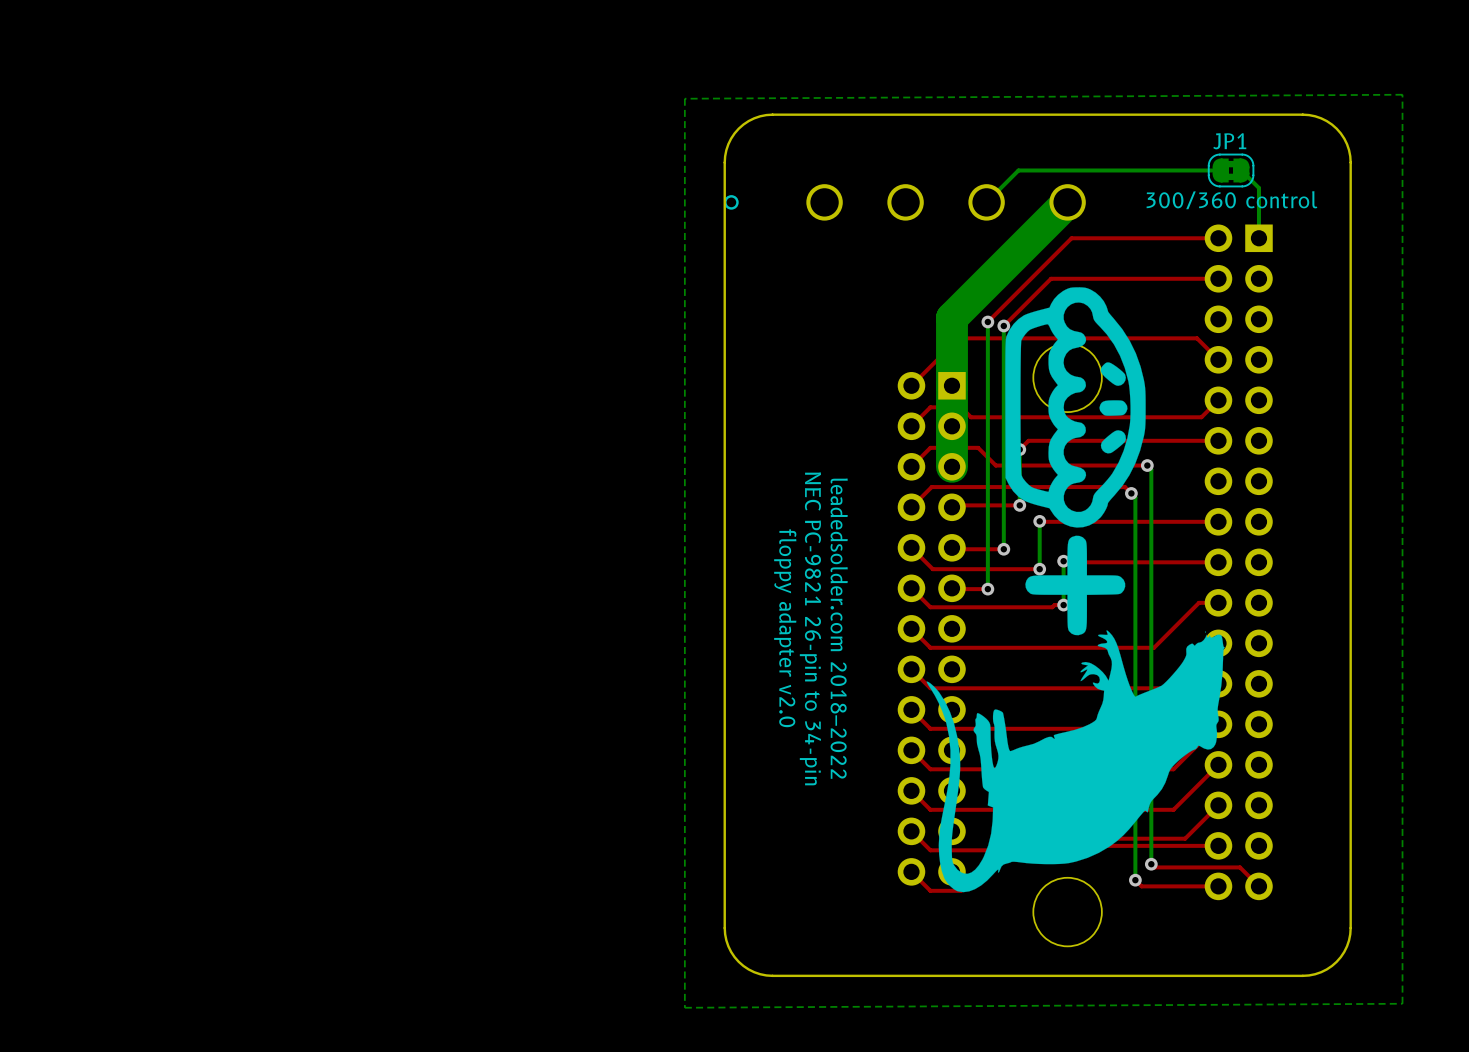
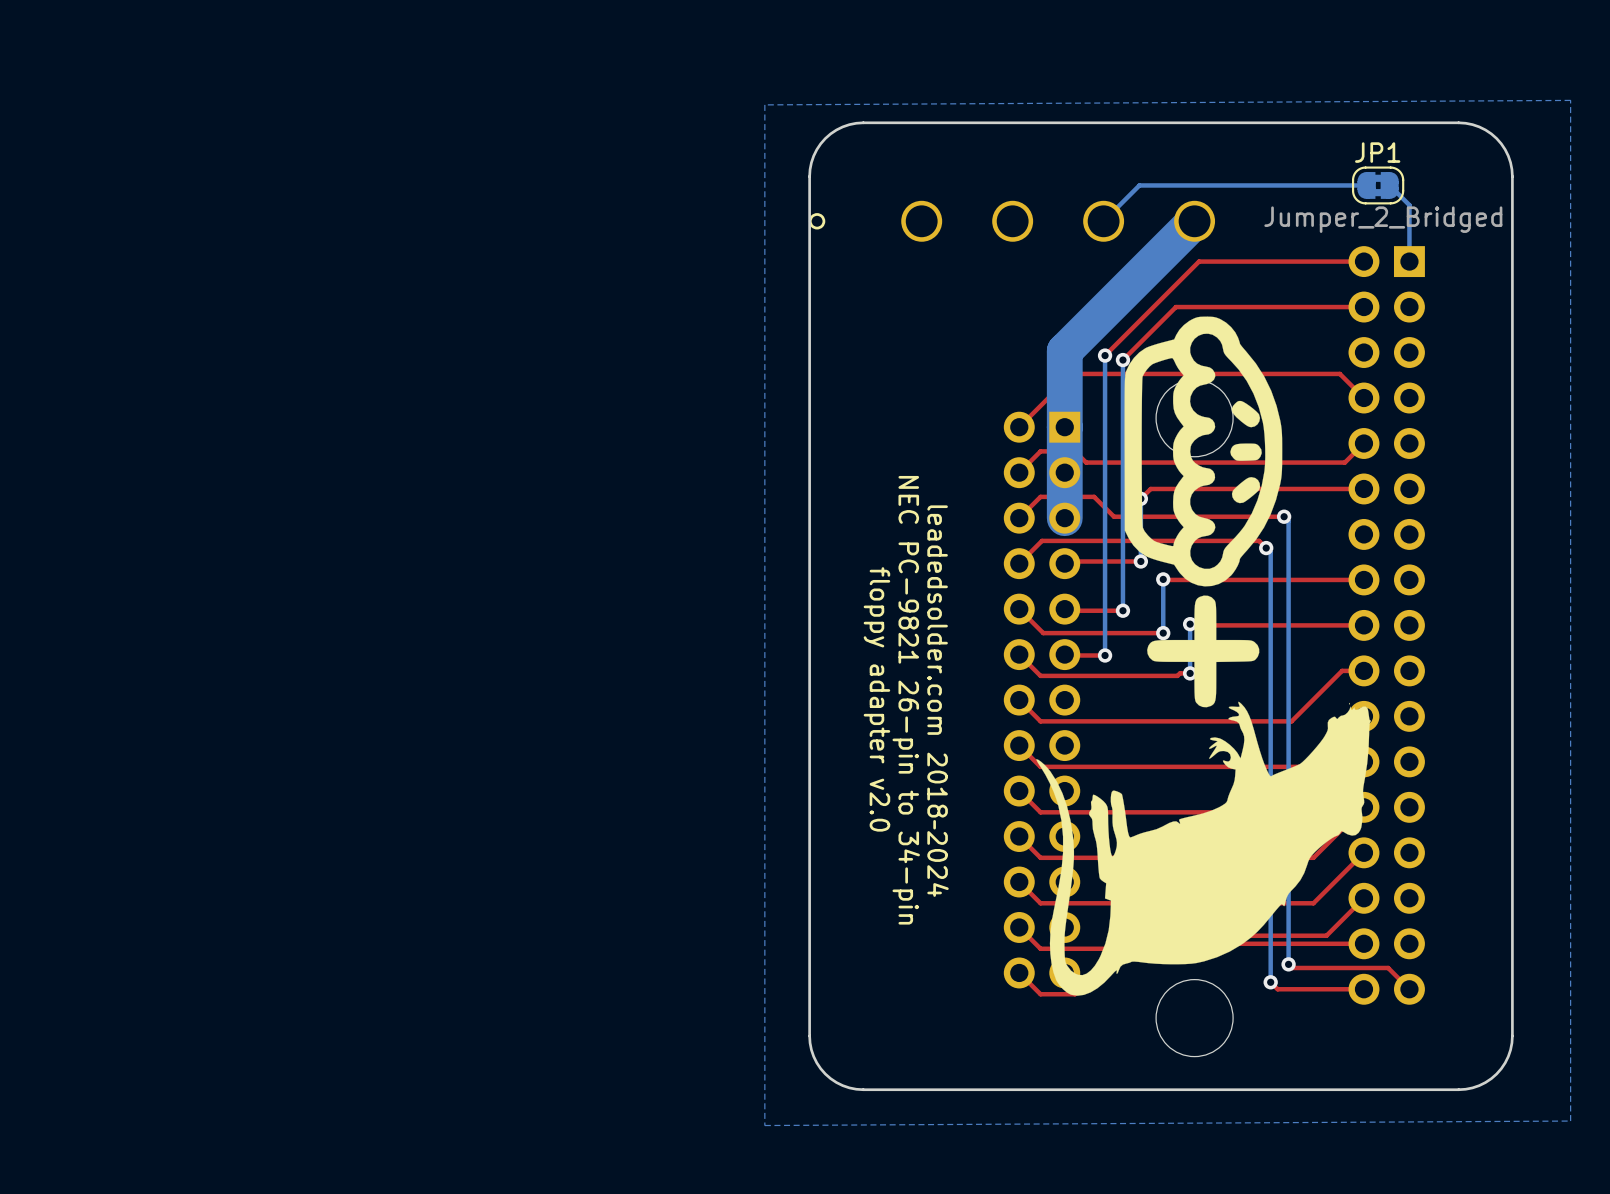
JP1 value: 300/360 control (1231, 200) -> Jumper_2_Bridged (1383, 219)
text: leadedsolder.com 2018–2022 (839, 628) -> leadedsolder.com 2018–2024 (938, 701)

